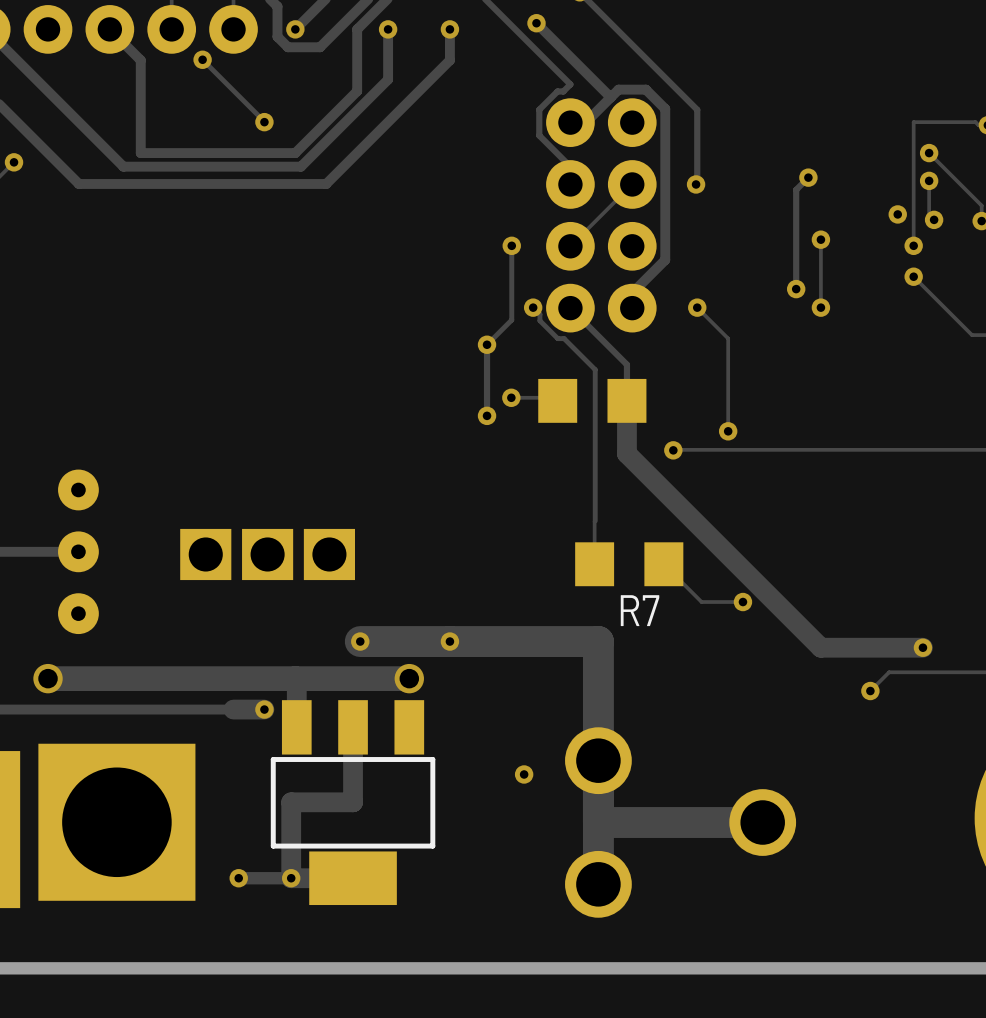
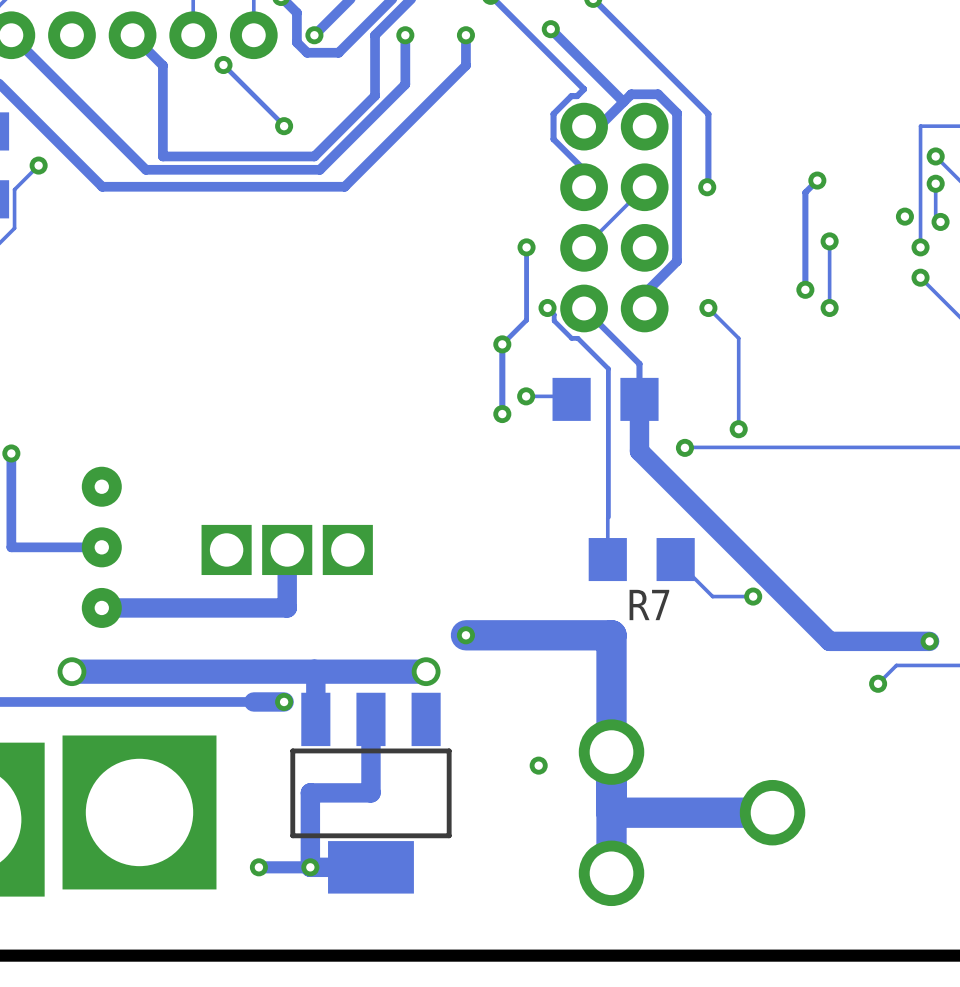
track: none -> (287, 549) (287, 607) (101, 607)
via: (360, 641) -> none
track: (449, 641) (360, 641) -> none

